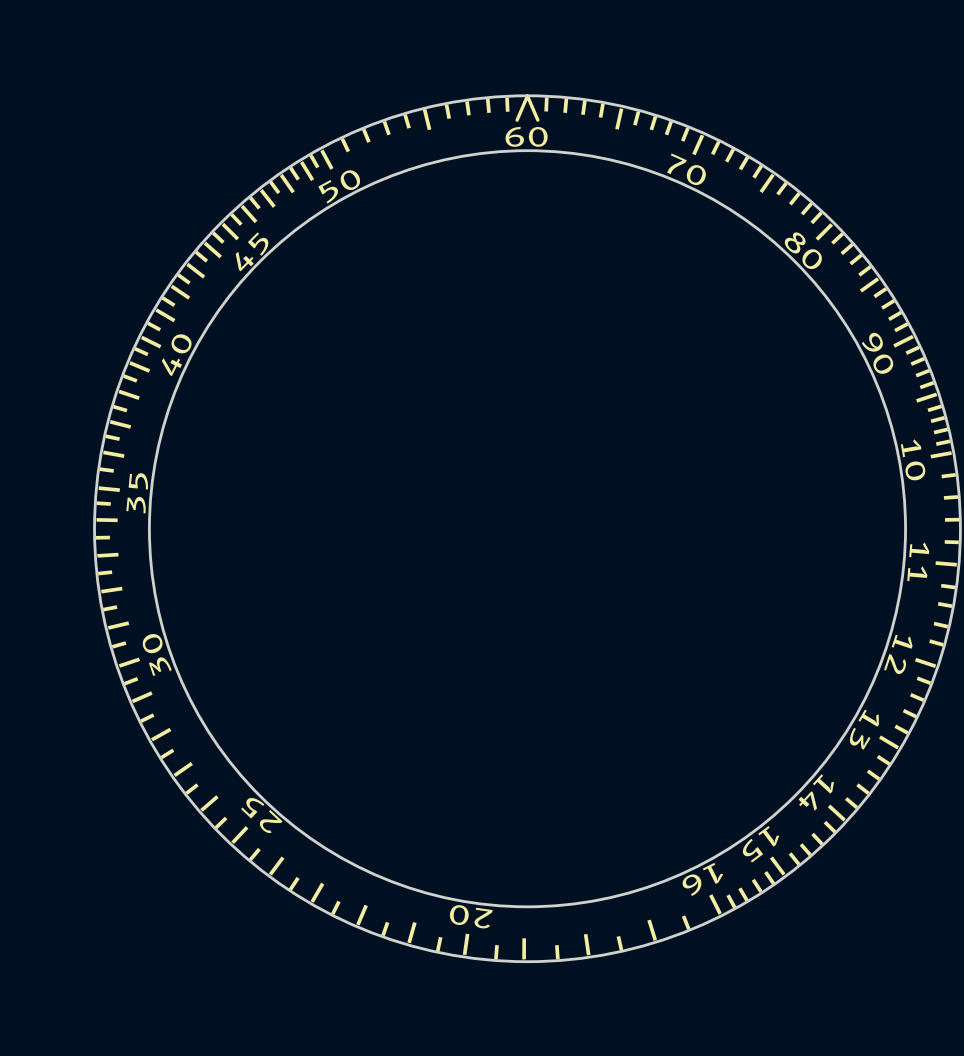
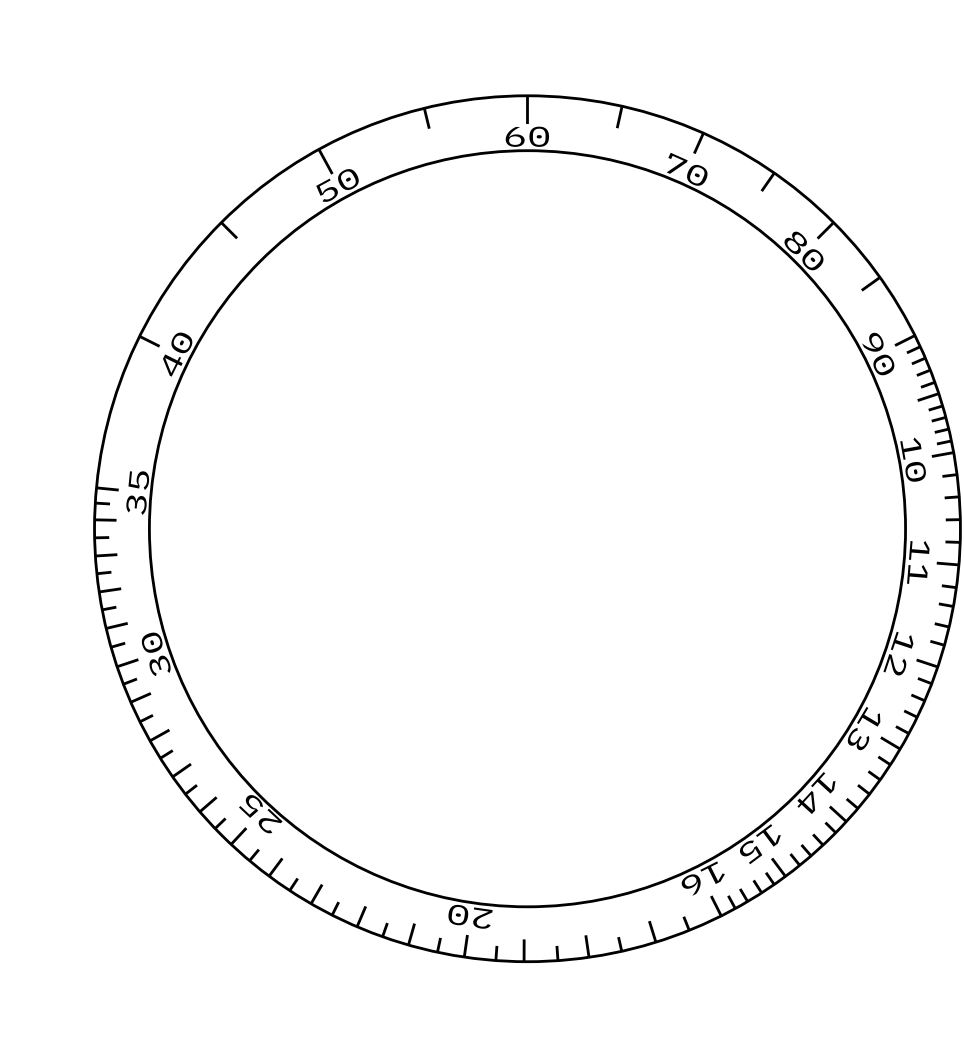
text: | (507, 104) -> none
text: | (546, 104) -> none
text: | (488, 105) -> none
text: | (565, 105) -> none
text: | (583, 107) -> none
text: | (467, 108) -> none
text: | (601, 110) -> none
text: | (447, 111) -> none
text: none -> | (527, 109)
text: | (636, 118) -> none
line: (517, 120) (527, 96) (537, 120) -> none
text: | (407, 121) -> none
text: | (653, 123) -> none
text: | (386, 128) -> none
text: | (668, 128) -> none
text: | (685, 134) -> none
text: | (366, 135) -> none
text: | (345, 145) -> none
text: | (715, 148) -> none
text: | (730, 155) -> none
text rotation: 0° (326, 159) -> 0.1° counterclockwise (325, 161)
text: | (314, 161) -> none
text: | (743, 163) -> none
text: | (307, 171) -> none
text: | (757, 171) -> none
text: | (294, 173) -> none
text: | (287, 183) -> none
text rotation: 0° (339, 186) -> 0.1° counterclockwise (337, 185)
text: | (274, 187) -> none
text: | (781, 188) -> none
text: | (267, 198) -> none
text: | (794, 198) -> none
text: | (254, 203) -> none
text: | (806, 208) -> none
text: | (249, 214) -> none
text: | (816, 217) -> none
text: | (236, 219) -> none
text: | (218, 237) -> none
text: | (837, 238) -> none
text: | (847, 249) -> none
text: | (212, 250) -> none
text: 45 (252, 251) -> none
text: | (201, 256) -> none
text: | (856, 259) -> none
text: | (195, 270) -> none
text: | (864, 270) -> none
text: | (183, 278) -> none
text: | (180, 292) -> none
text: | (880, 292) -> none
text: | (168, 301) -> none
text: | (888, 304) -> none
text: | (165, 315) -> none
text: | (895, 315) -> none
text: | (154, 326) -> none
text: | (901, 327) -> none
text: | (141, 351) -> none
text: | (139, 366) -> none
text: | (130, 378) -> none
text: | (129, 394) -> none
text: | (120, 408) -> none
text: | (120, 424) -> none
text: | (112, 437) -> none
text: | (113, 454) -> none
text: | (106, 470) -> none

